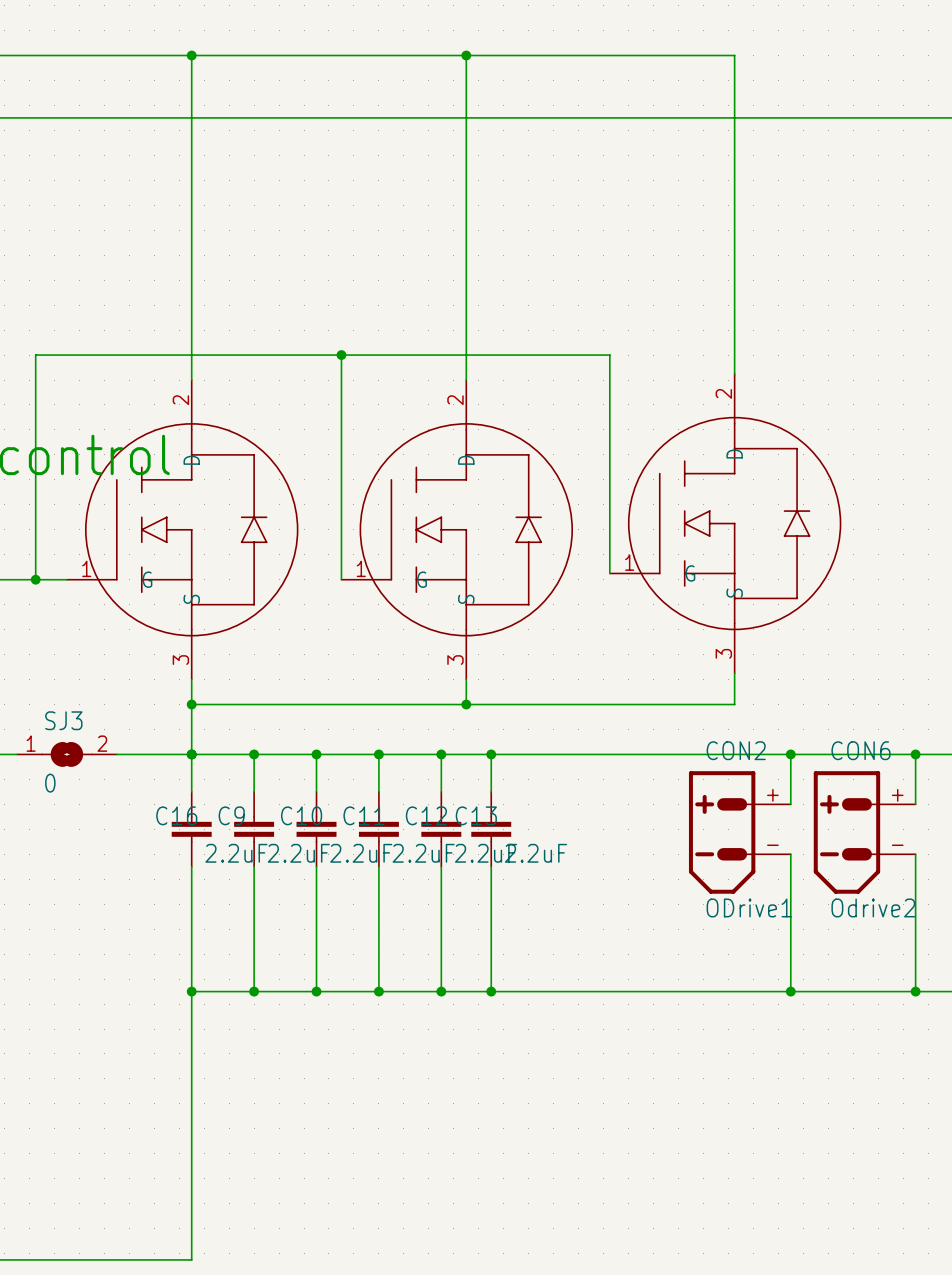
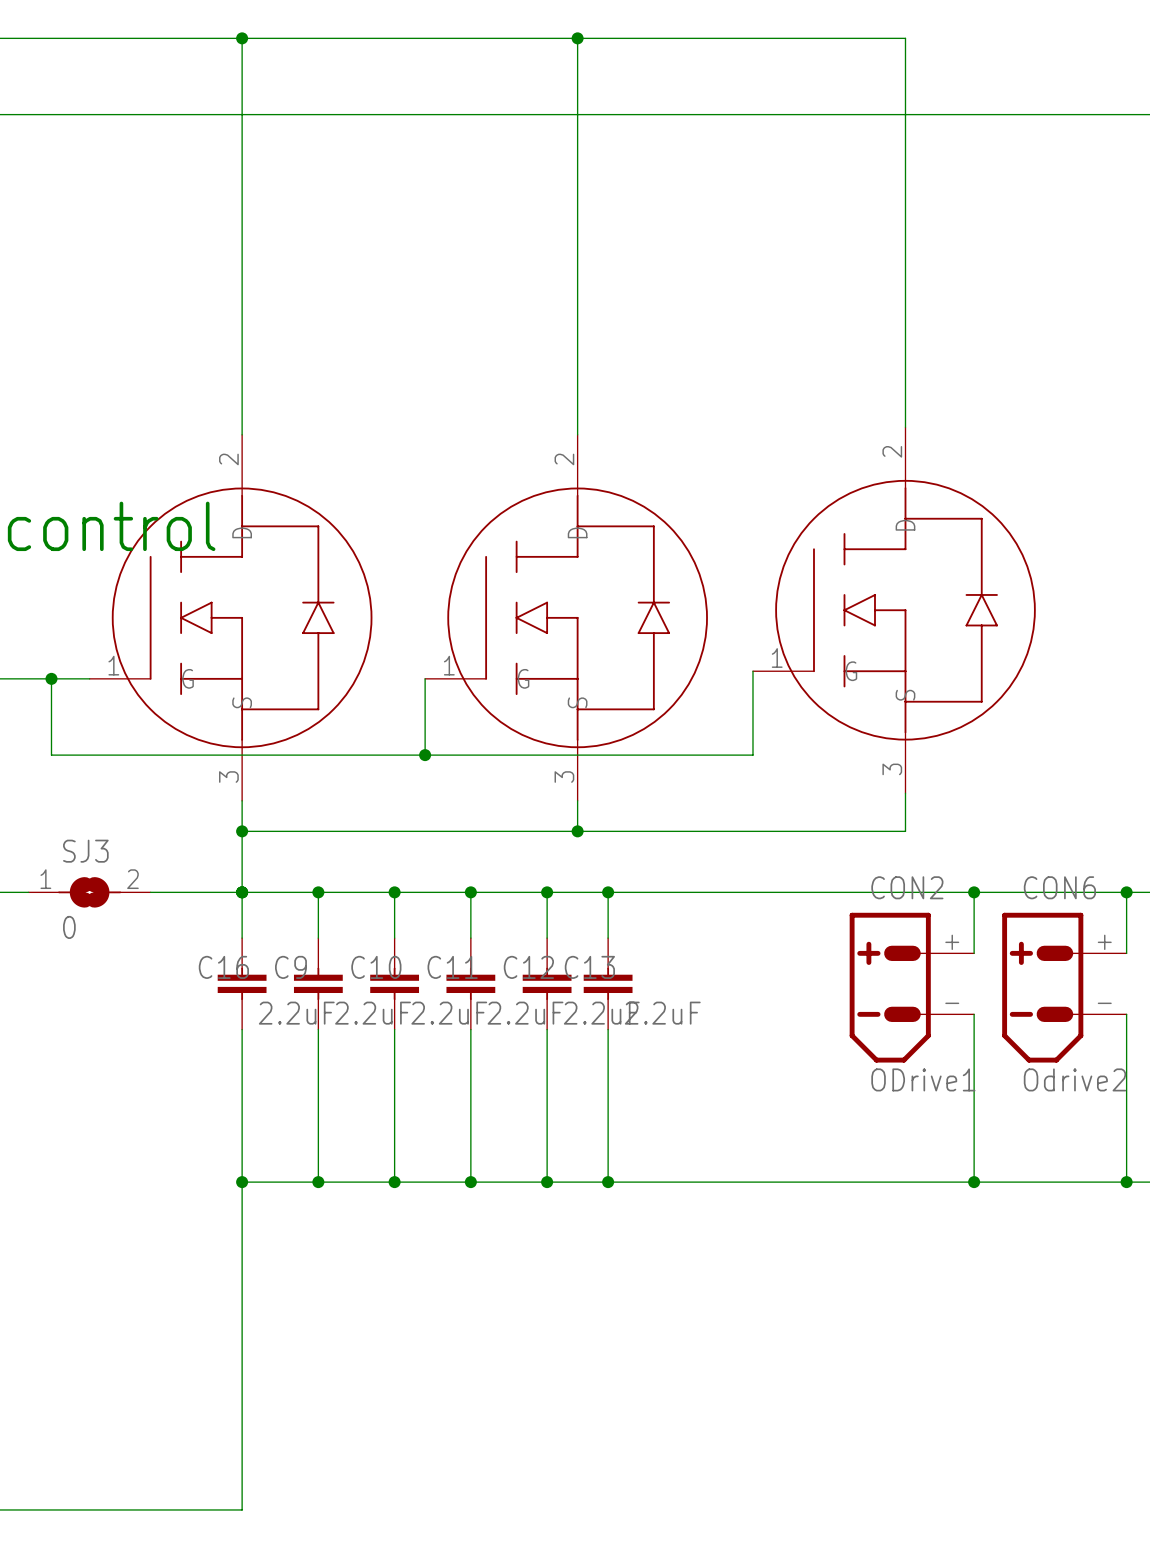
wire: (341, 355) (341, 579) -> (425, 755) (425, 678)
junction: (341, 355) -> none
wire: (609, 573) (609, 355) (35, 355) (35, 579) -> (752, 671) (752, 755) (51, 755) (51, 678)
junction: none -> (425, 755)

